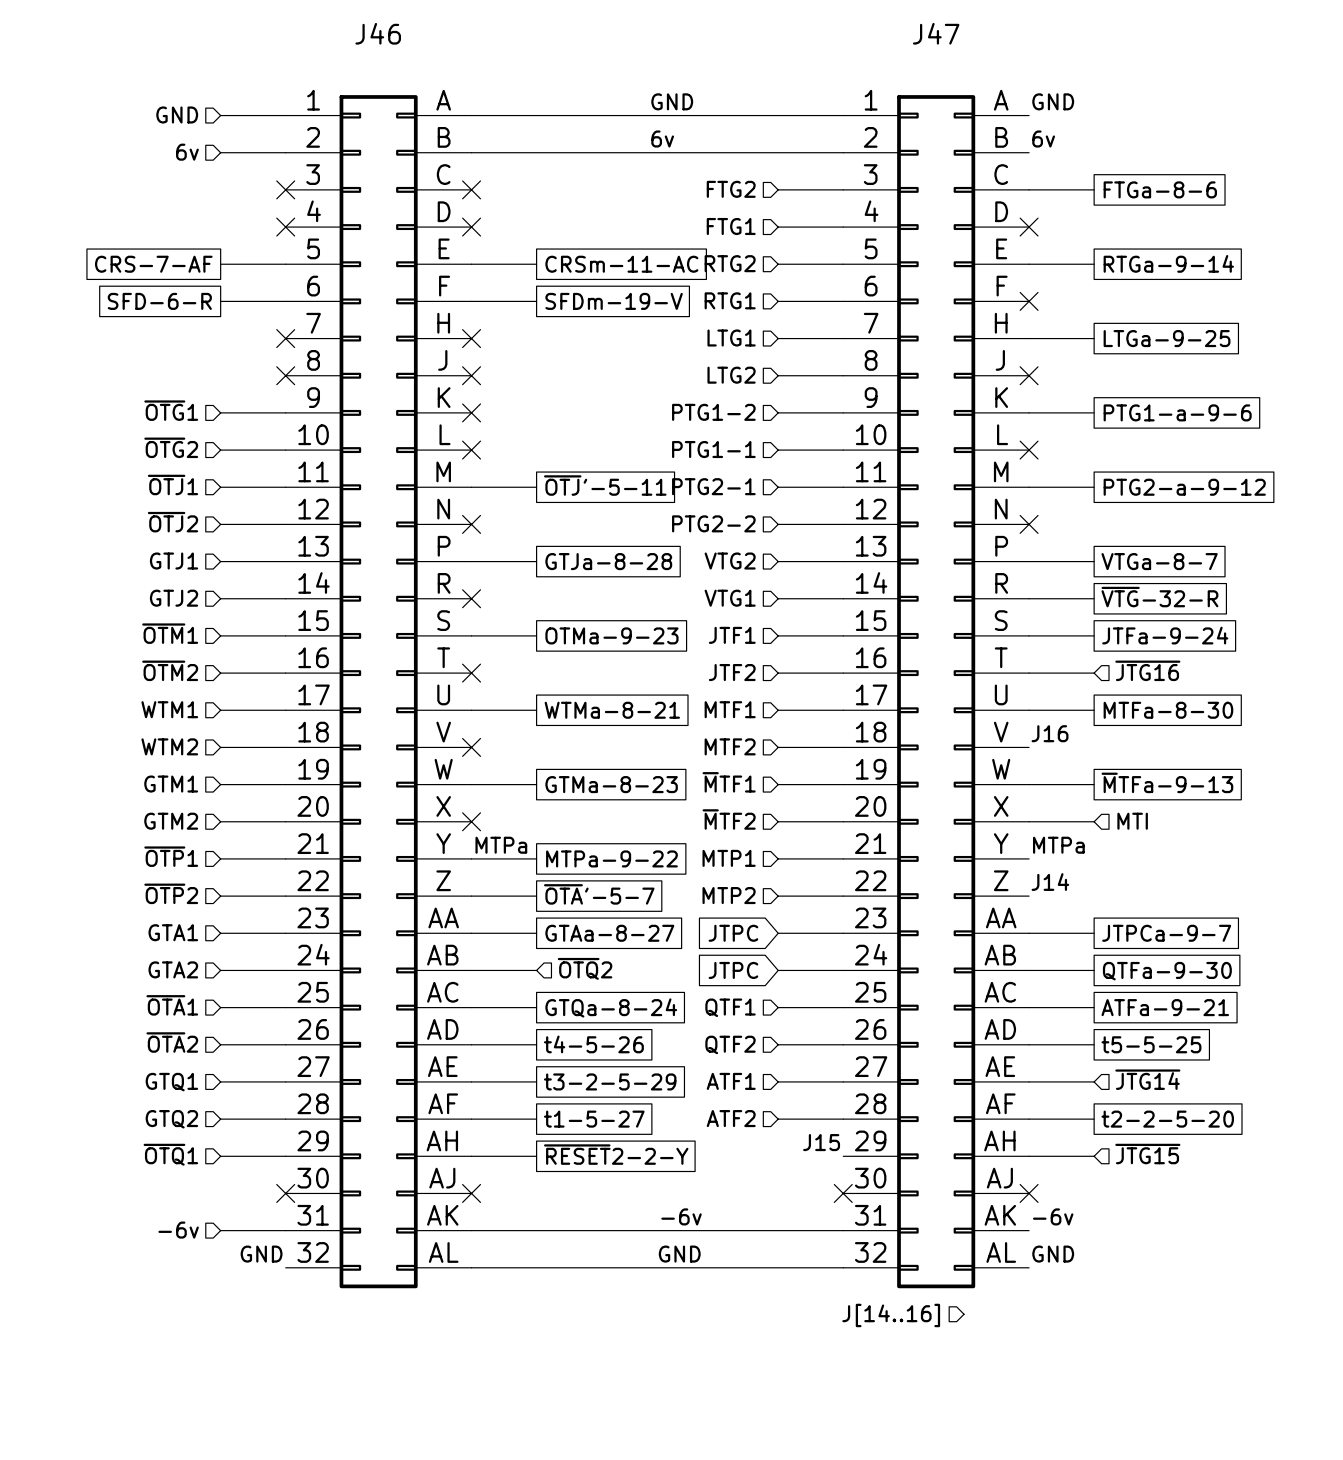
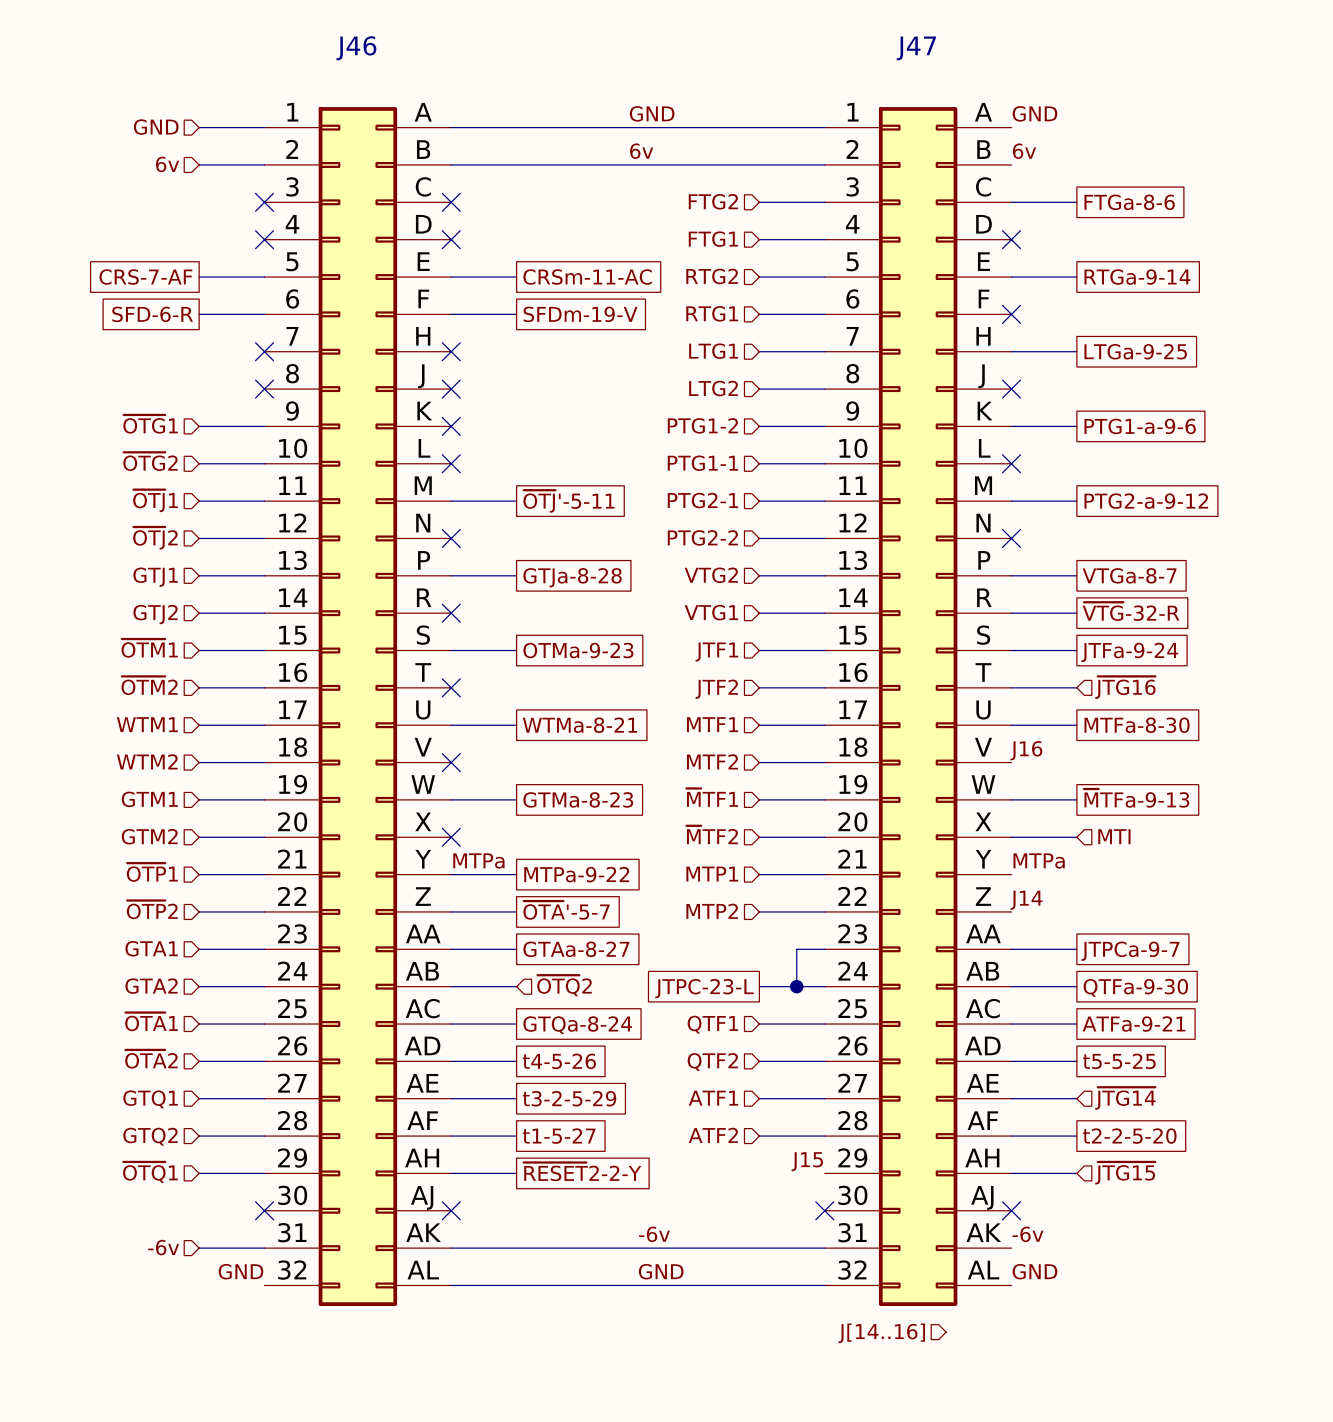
global label: JTPC (733, 933) -> none
wire: (778, 933) (815, 933) -> (796, 986) (796, 949)
global label shape: input (733, 970) -> passive (704, 988)
global label: JTPC (733, 970) -> JTPC-23-L (704, 988)
junction: none -> (796, 986)

